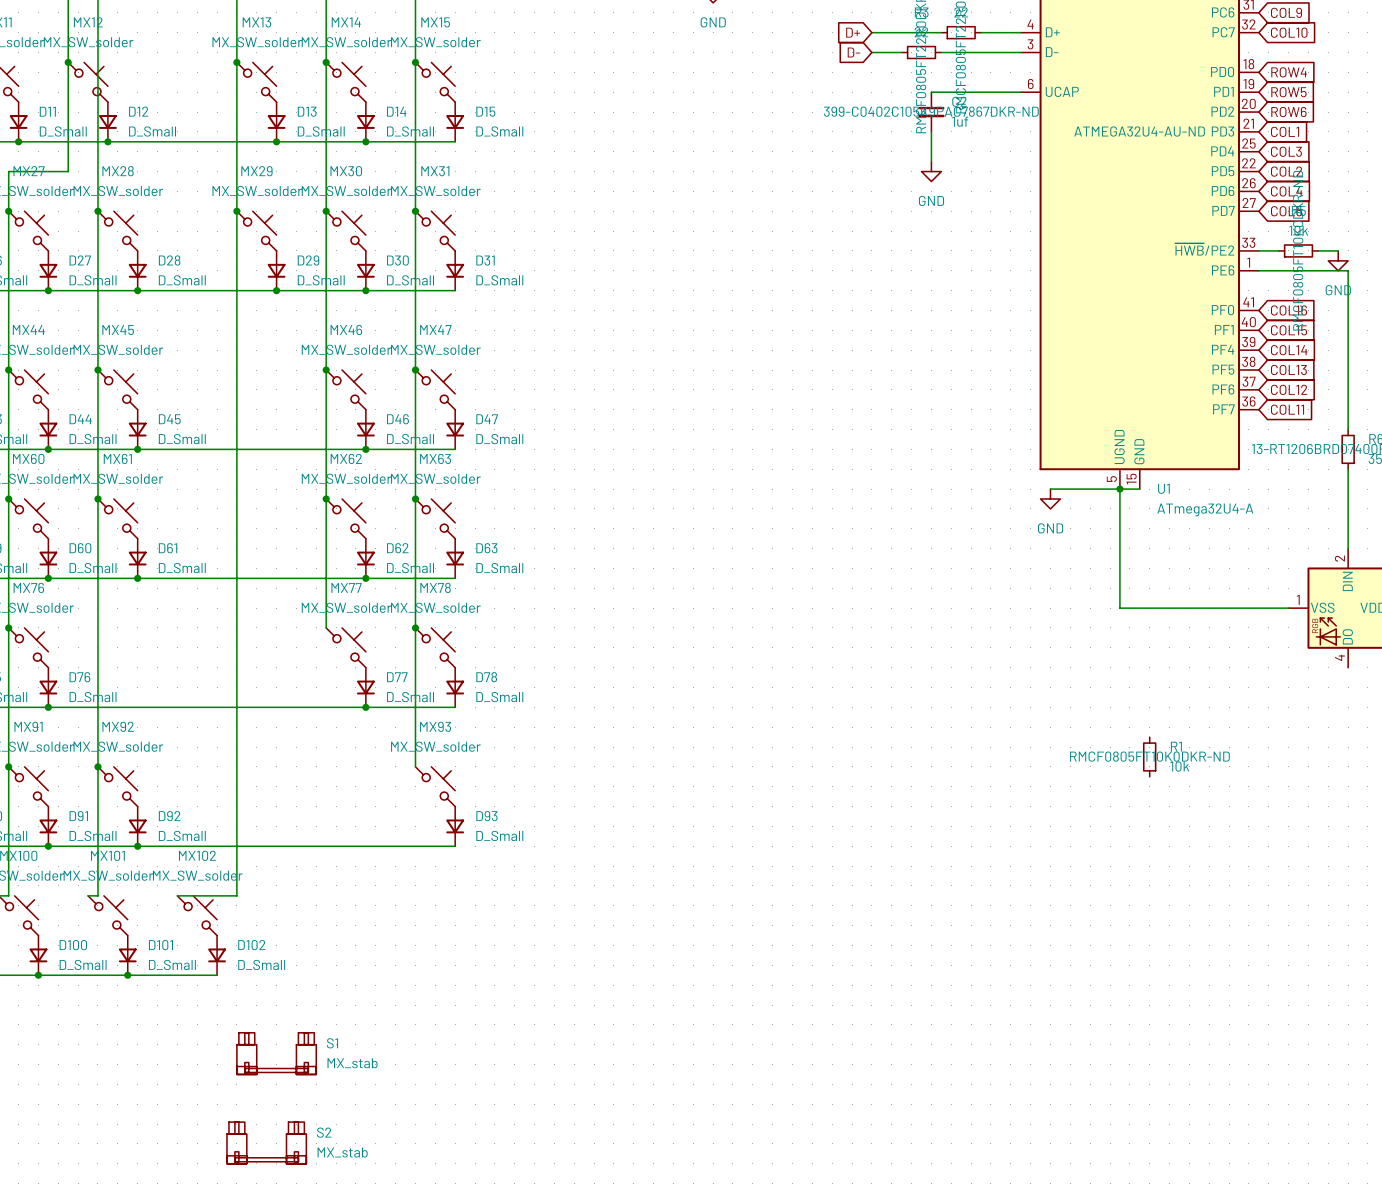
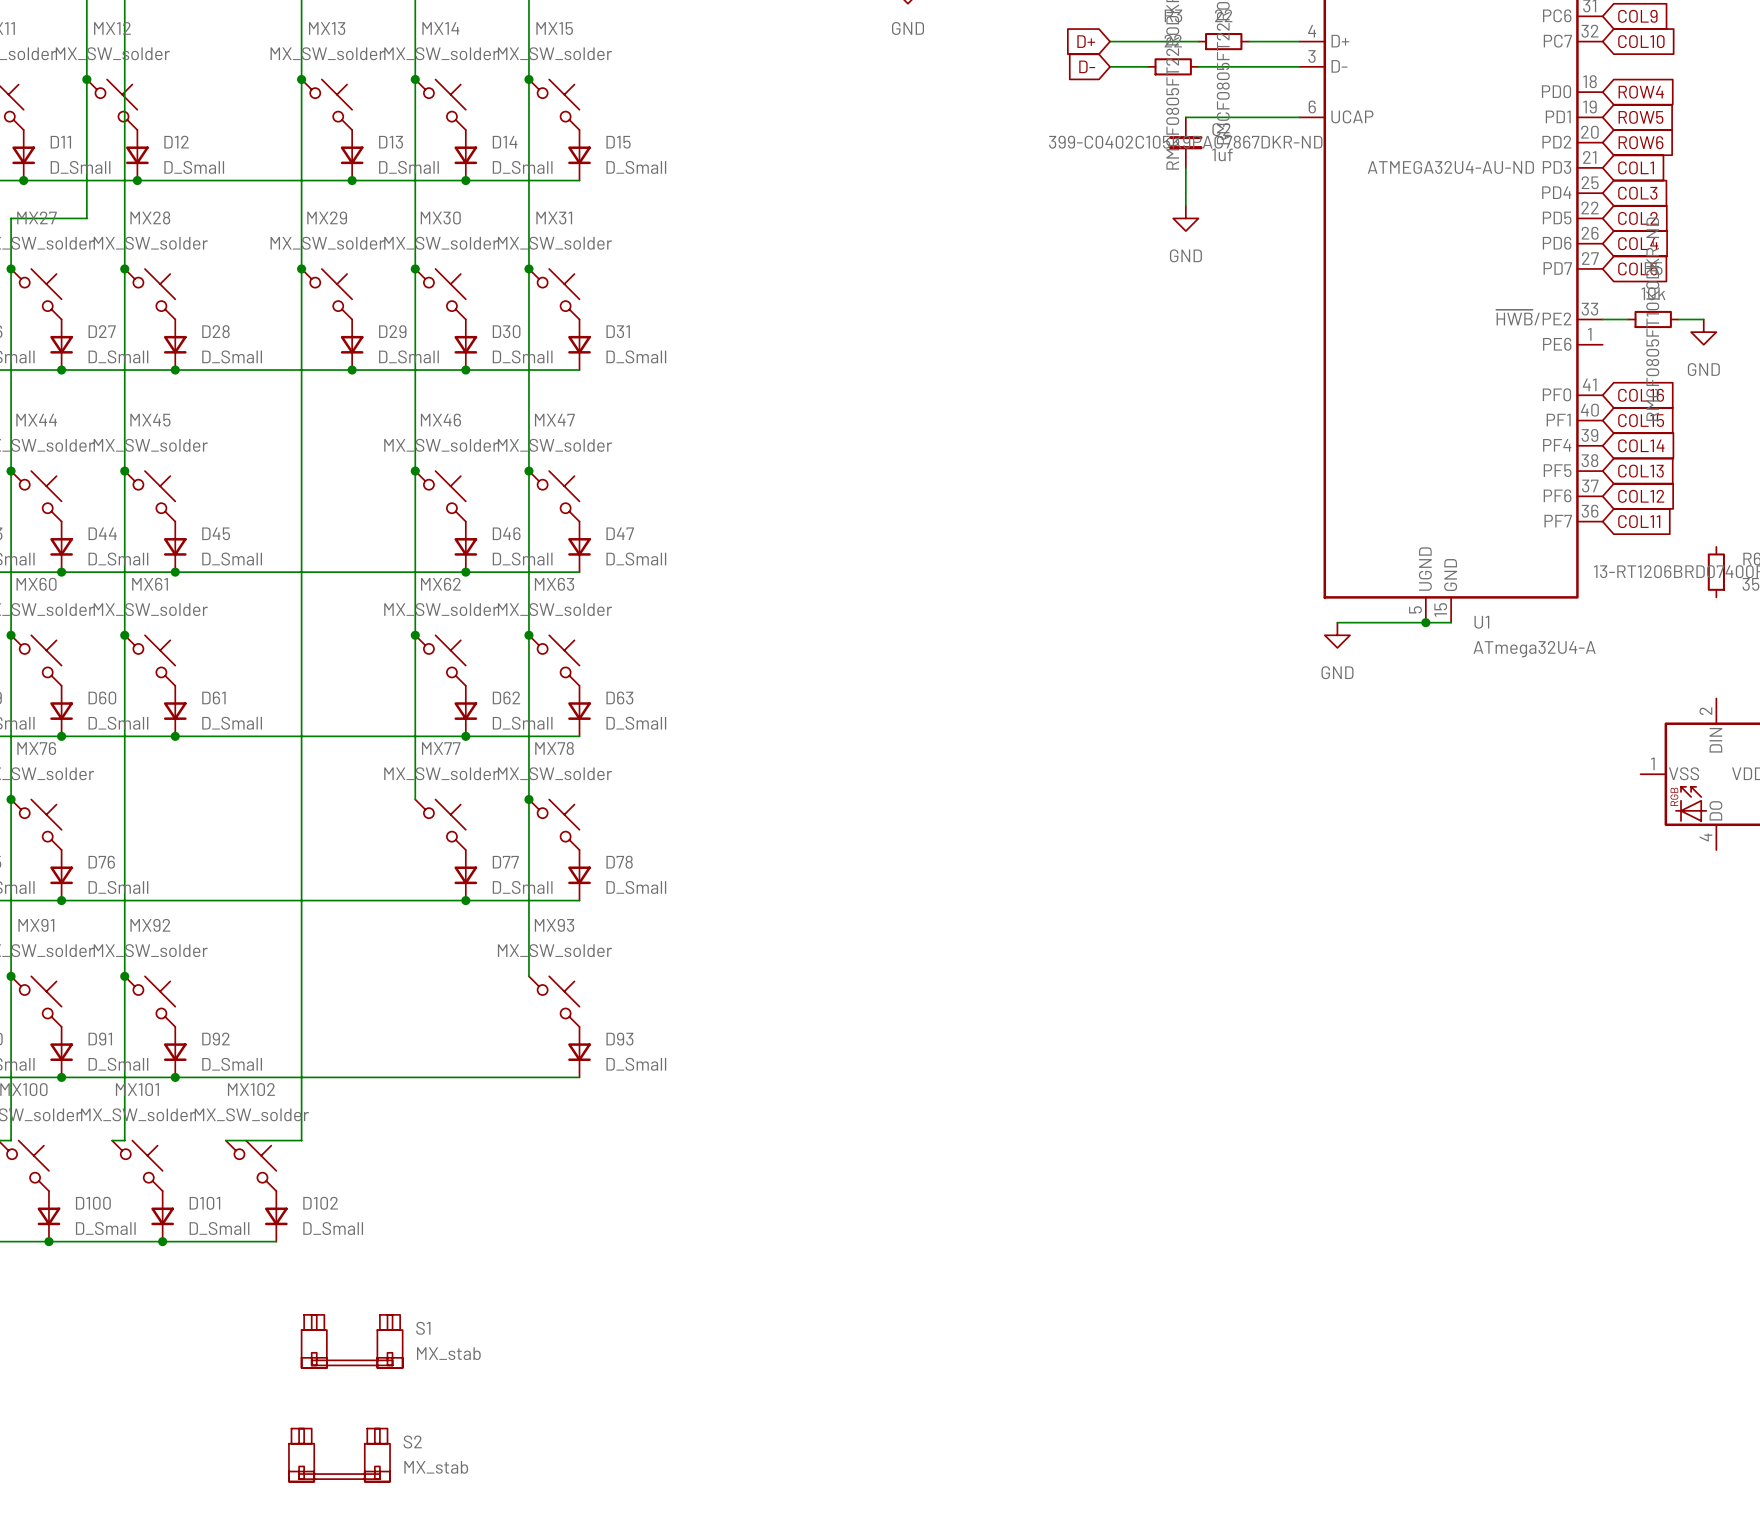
wire: (1258, 270) (1348, 270) (1348, 429) -> none
wire: (1348, 469) (1348, 548) -> none
wire: (1119, 489) (1119, 608) (1288, 608) -> none
R1: 10k (1149, 756) -> none

